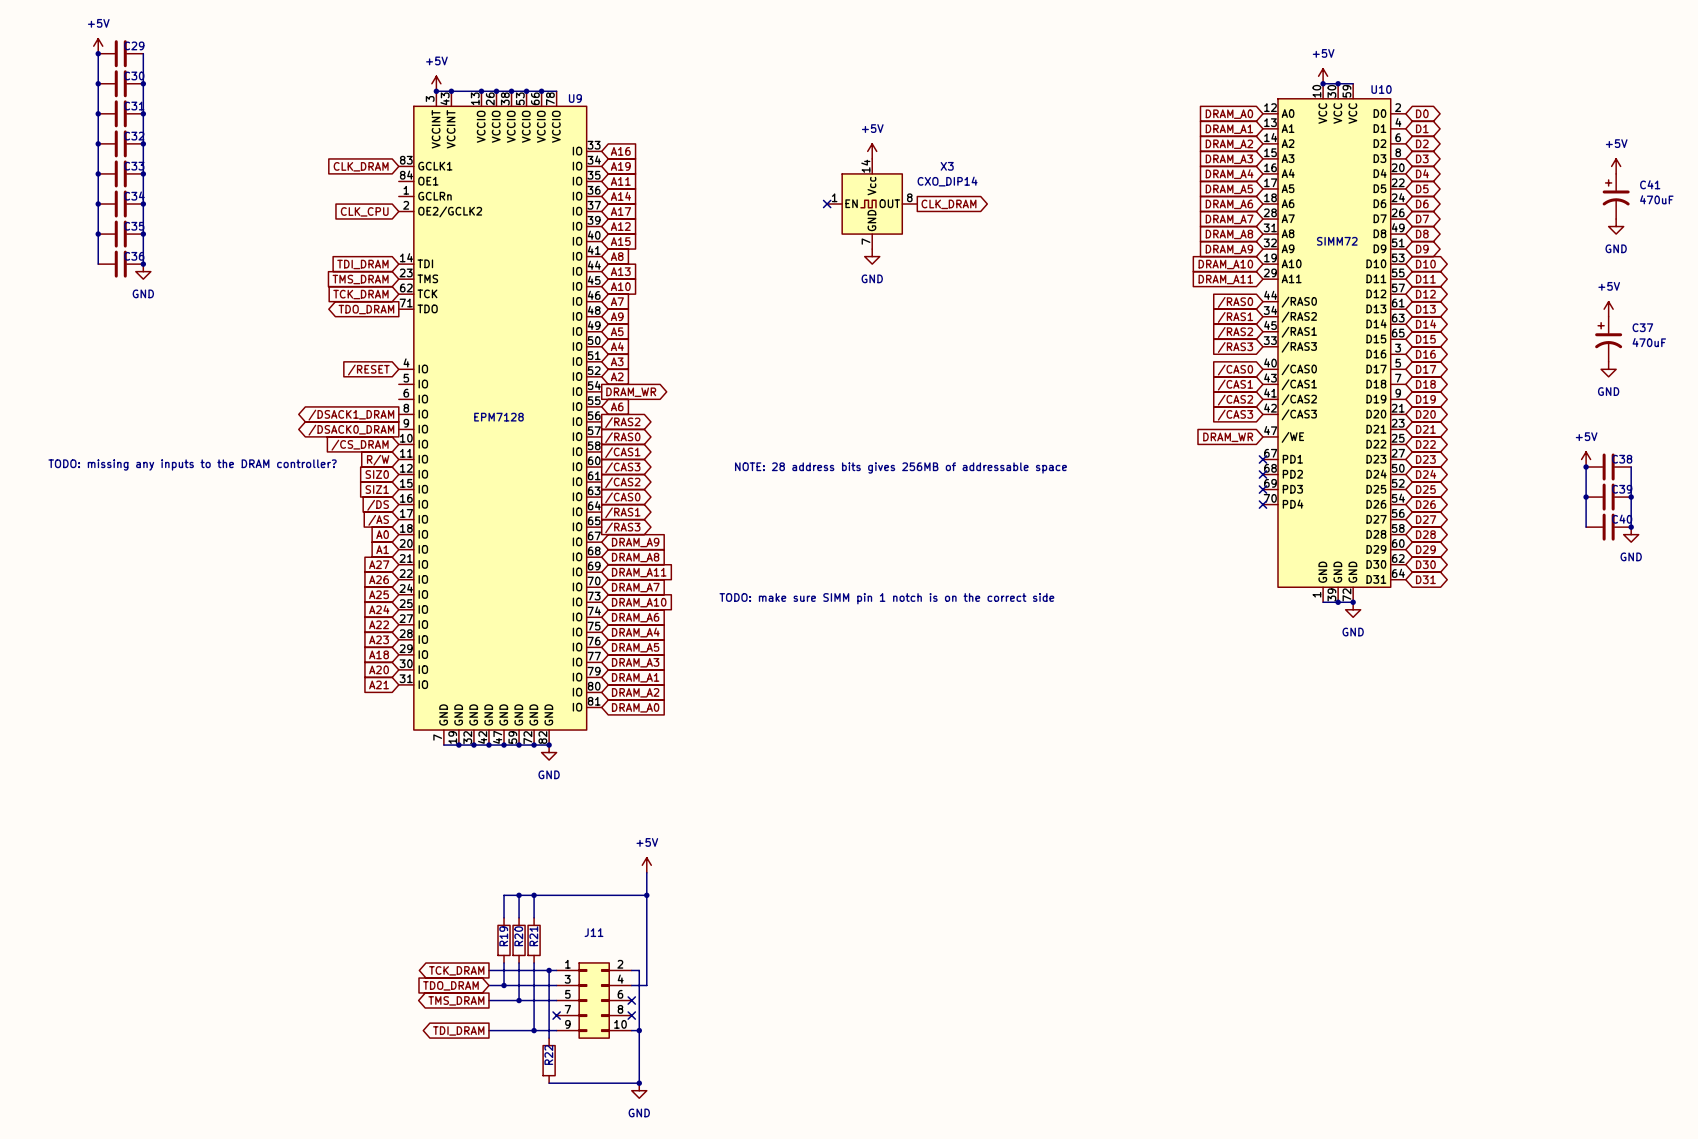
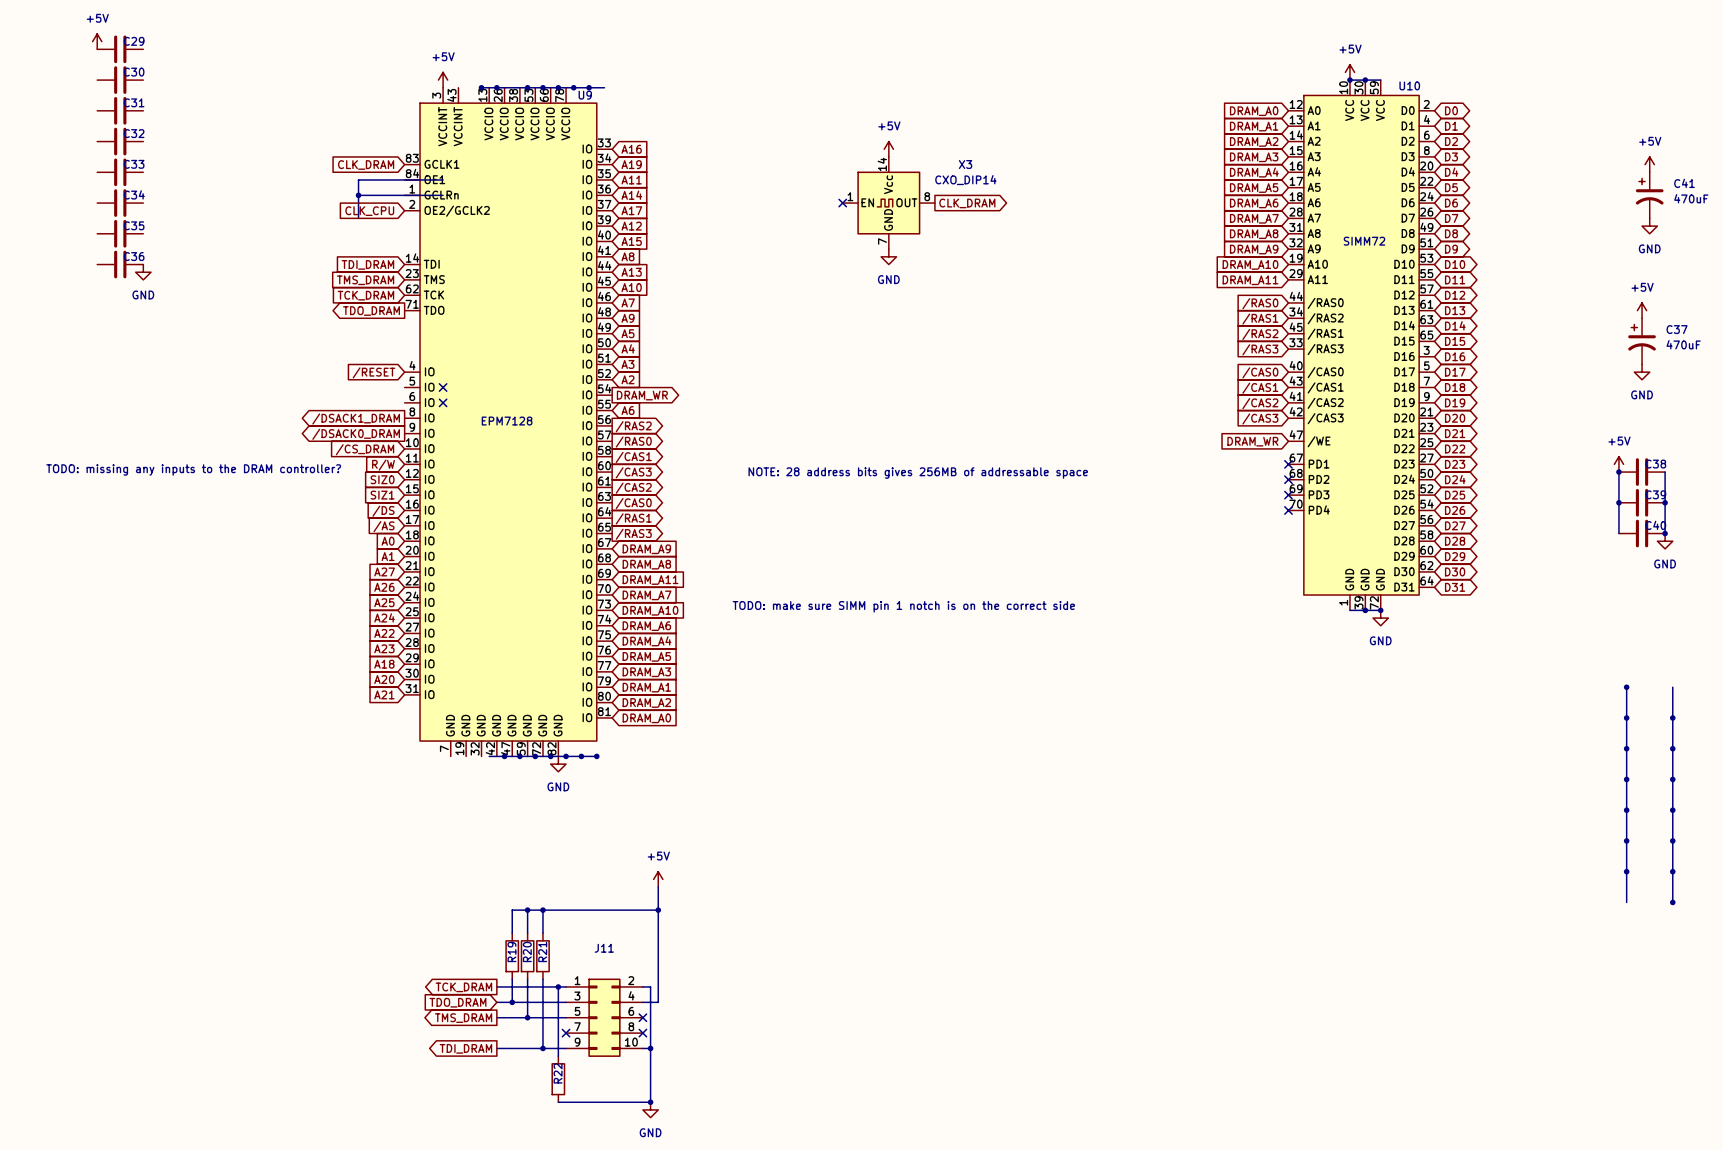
wire: (98, 53) (98, 264) -> none
junction: (98, 53) -> none
wire: (143, 53) (143, 264) -> none
junction: (98, 83) -> none
junction: (143, 83) -> none
wire: (436, 91) (473, 91) -> (566, 87) (604, 87)
junction: (436, 91) -> none
junction: (451, 91) -> none
junction: none -> (481, 87)
junction: (481, 91) -> none
junction: none -> (496, 87)
junction: (496, 91) -> none
junction: (511, 91) -> none
junction: none -> (527, 87)
junction: (526, 91) -> none
junction: none -> (542, 87)
junction: (541, 91) -> none
junction: none -> (558, 87)
junction: none -> (573, 87)
junction: none -> (589, 87)
junction: (98, 113) -> none
junction: (143, 113) -> none
junction: (98, 143) -> none
junction: (143, 143) -> none
junction: (98, 173) -> none
junction: (143, 173) -> none
wire: none -> (443, 179) (358, 179) (358, 218)
wire: none -> (358, 195) (443, 195)
junction: none -> (358, 195)
junction: (98, 204) -> none
junction: (143, 204) -> none
junction: (98, 234) -> none
junction: (143, 234) -> none
junction: (143, 264) -> none
no-connect mark: none -> (443, 387)
no-connect mark: none -> (443, 402)
wire: none -> (1626, 687) (1626, 902)
junction: none -> (1626, 687)
wire: none -> (1672, 687) (1672, 902)
junction: none -> (1626, 717)
junction: none -> (1672, 717)
junction: none -> (1626, 748)
junction: none -> (1672, 748)
wire: (443, 745) (481, 745) -> (558, 756) (596, 756)
junction: (458, 745) -> none
junction: (473, 745) -> none
junction: (488, 745) -> none
junction: none -> (504, 756)
junction: (504, 745) -> none
junction: none -> (519, 756)
junction: (519, 745) -> none
junction: none -> (535, 756)
junction: (534, 745) -> none
junction: none -> (550, 756)
junction: (549, 745) -> none
junction: none -> (566, 756)
junction: none -> (581, 756)
junction: none -> (596, 756)
junction: none -> (1626, 779)
junction: none -> (1672, 779)
junction: none -> (1626, 810)
junction: none -> (1672, 810)
junction: none -> (1626, 840)
junction: none -> (1672, 840)
junction: none -> (1626, 871)
junction: none -> (1672, 871)
junction: none -> (1672, 902)

